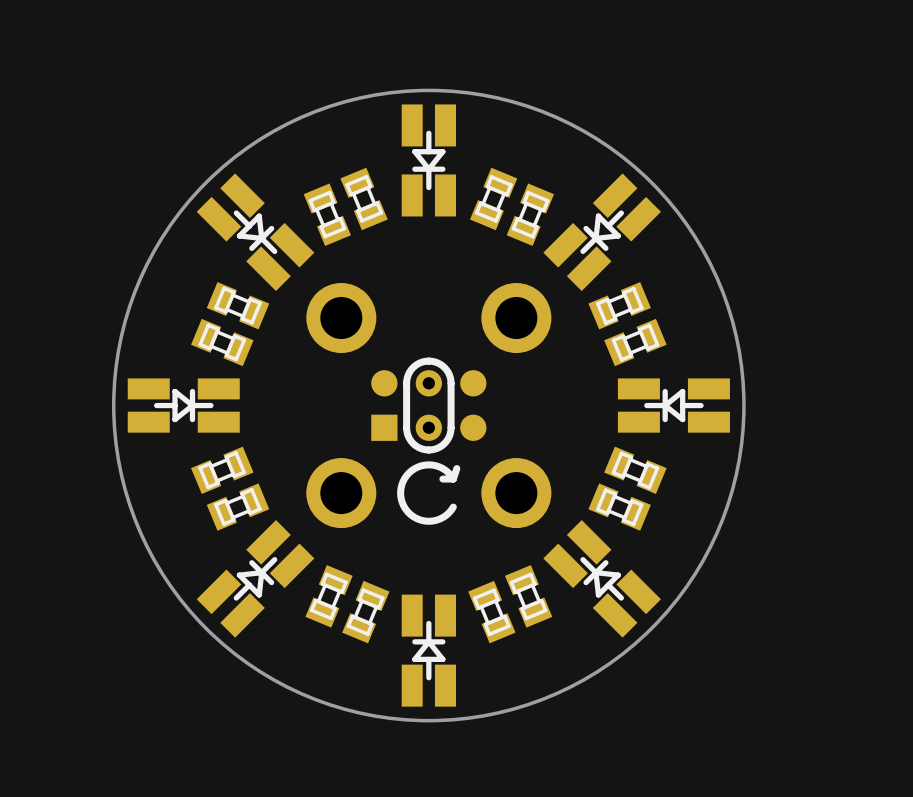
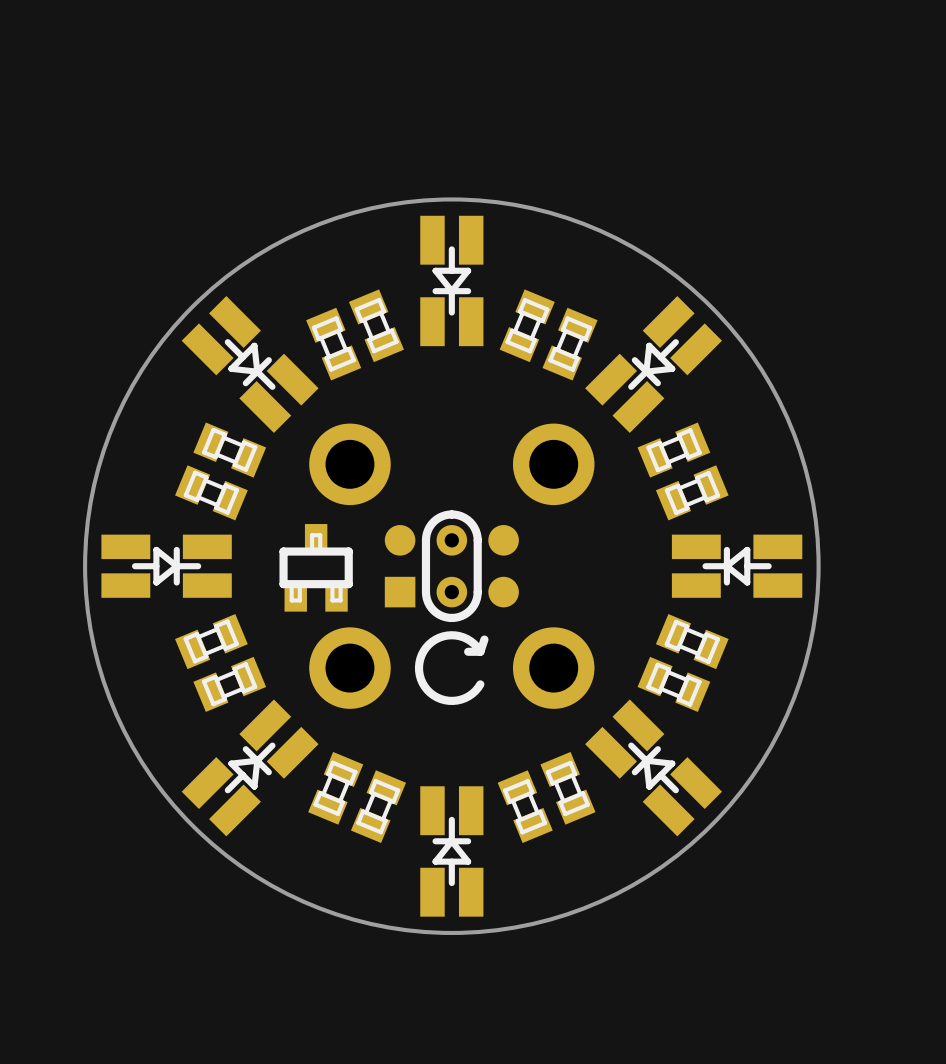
part: none -> (316, 567)

